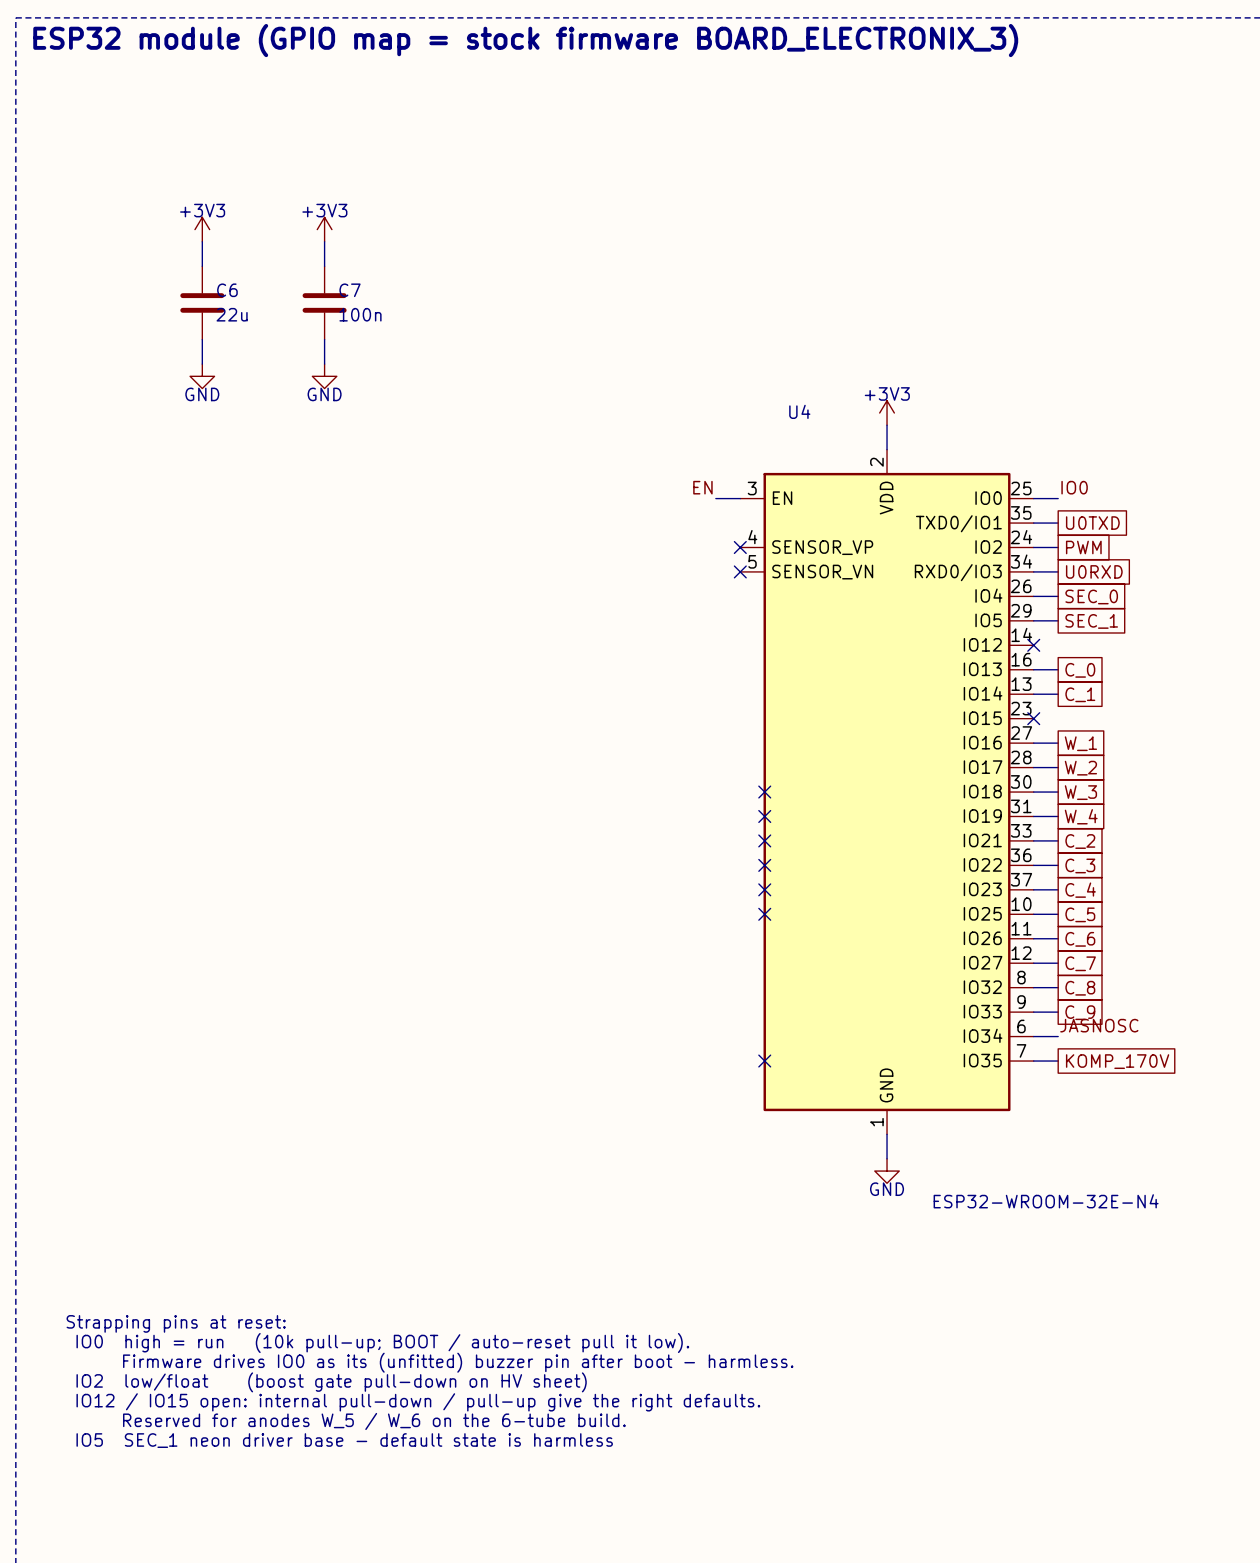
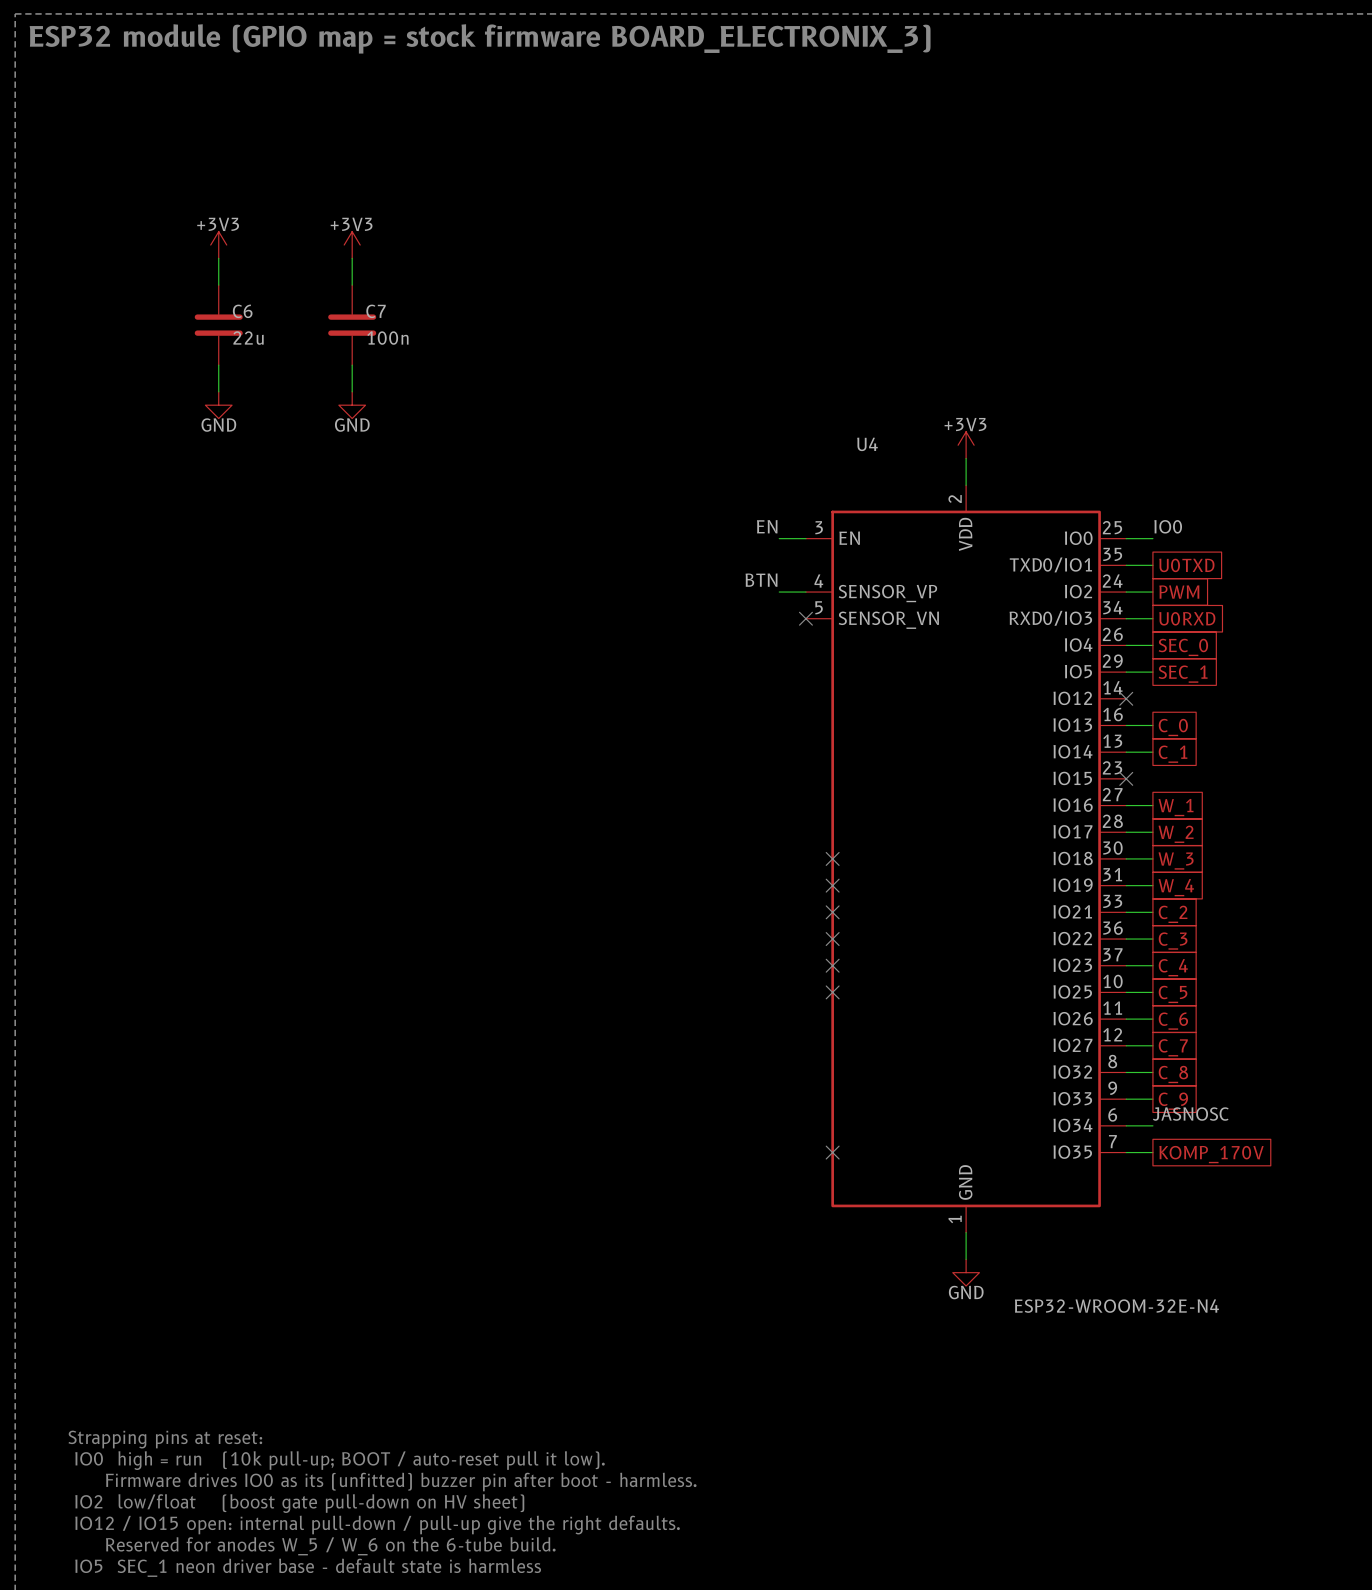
label: none -> BTN (761, 580)
wire: none -> (779, 592) (805, 592)
no-connect mark: (740, 547) -> none

